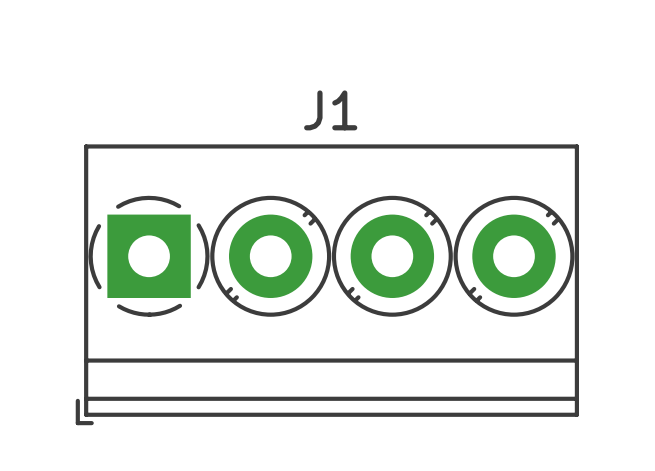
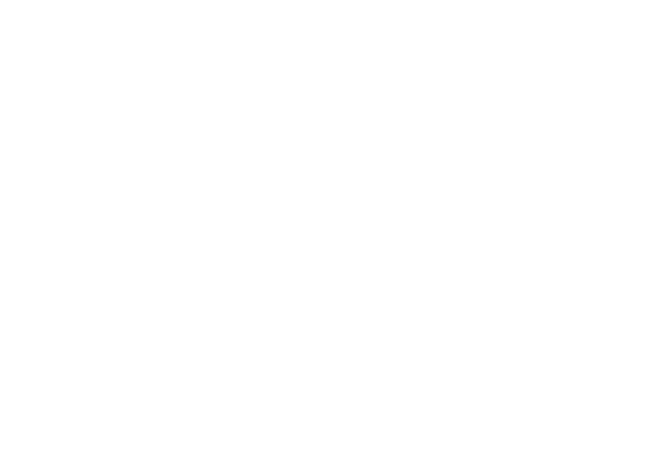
J1: (327, 284) -> none

